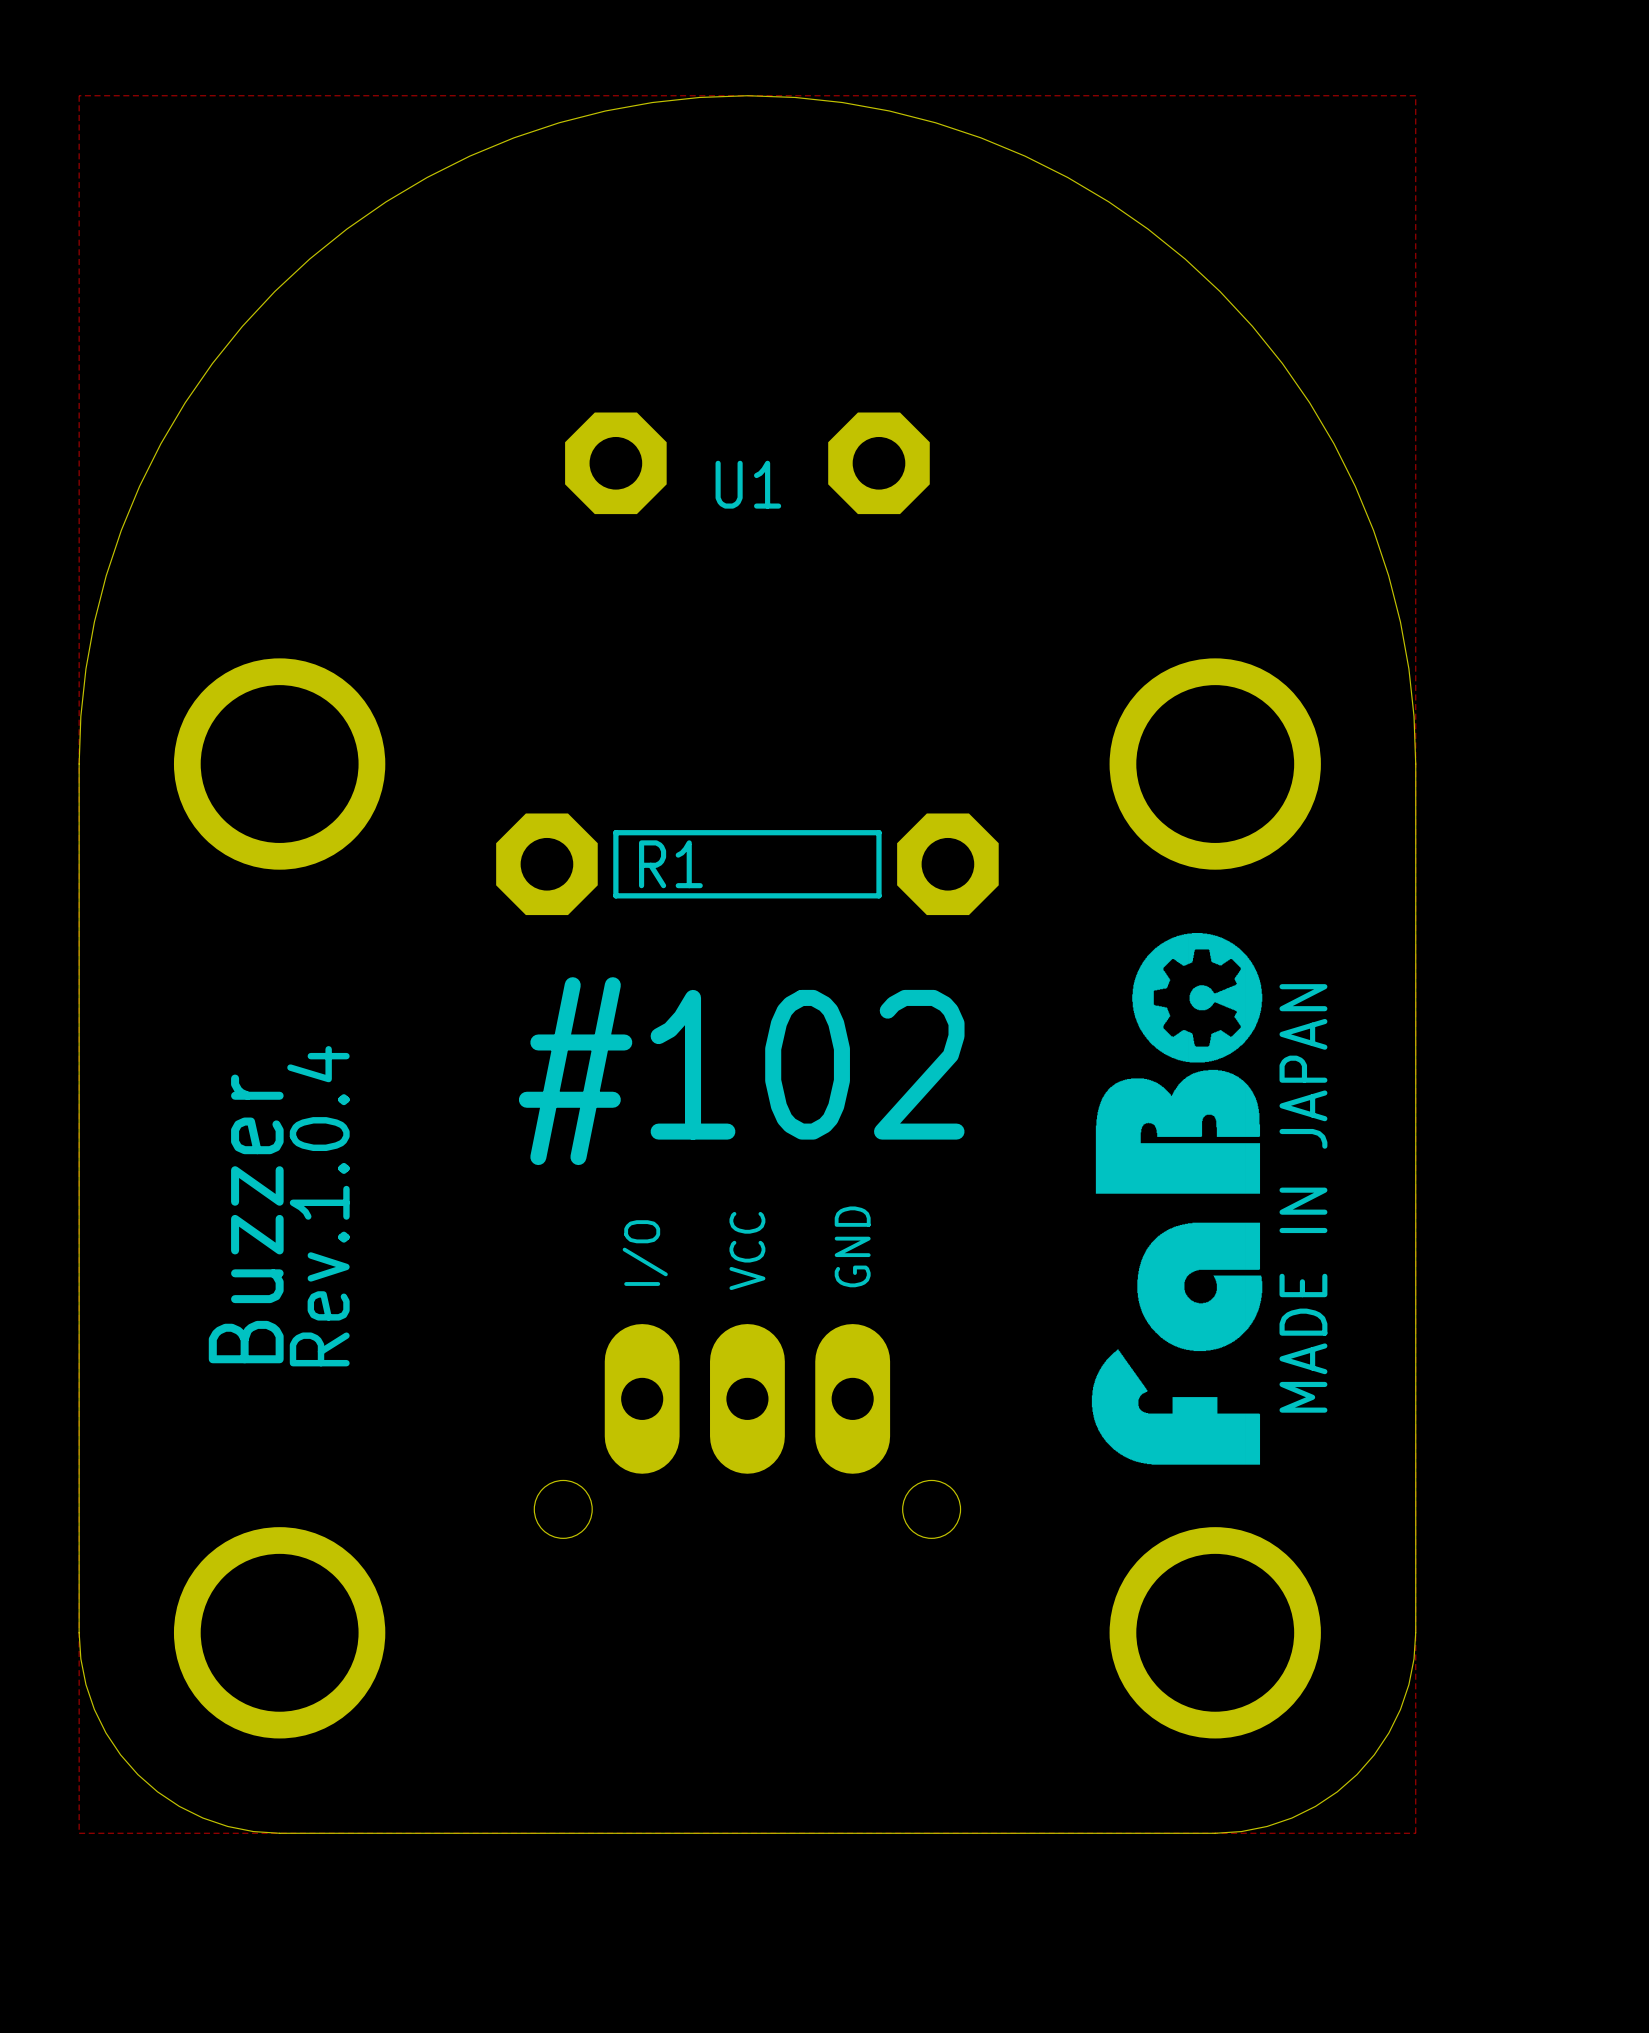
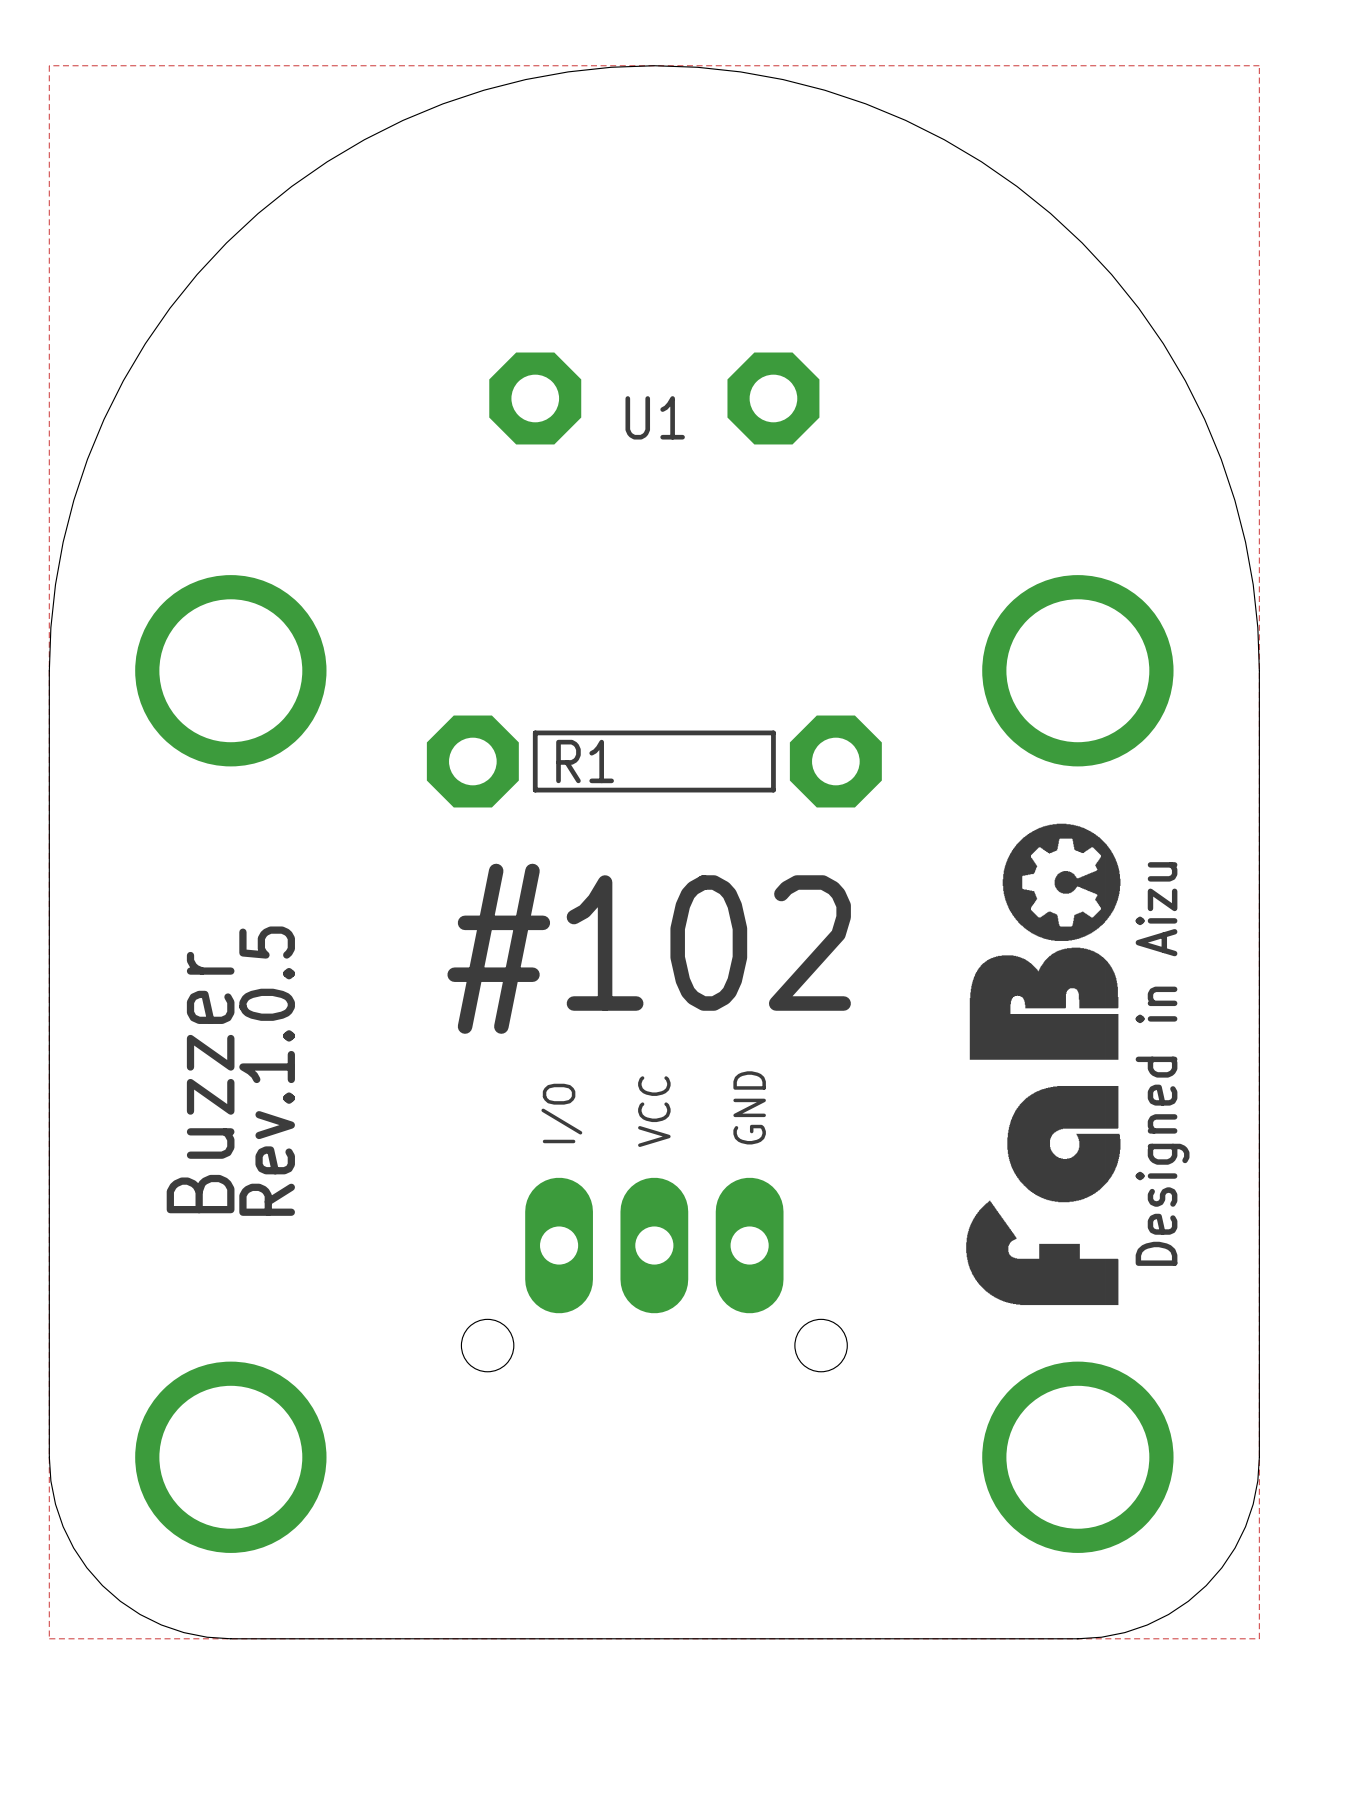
text: MADE IN JAPAN (1303, 1198) -> Designed in Aizu (1162, 1064)
text: Rev.1.0.4 (318, 1206) -> Rev.1.0.5 (267, 1071)

